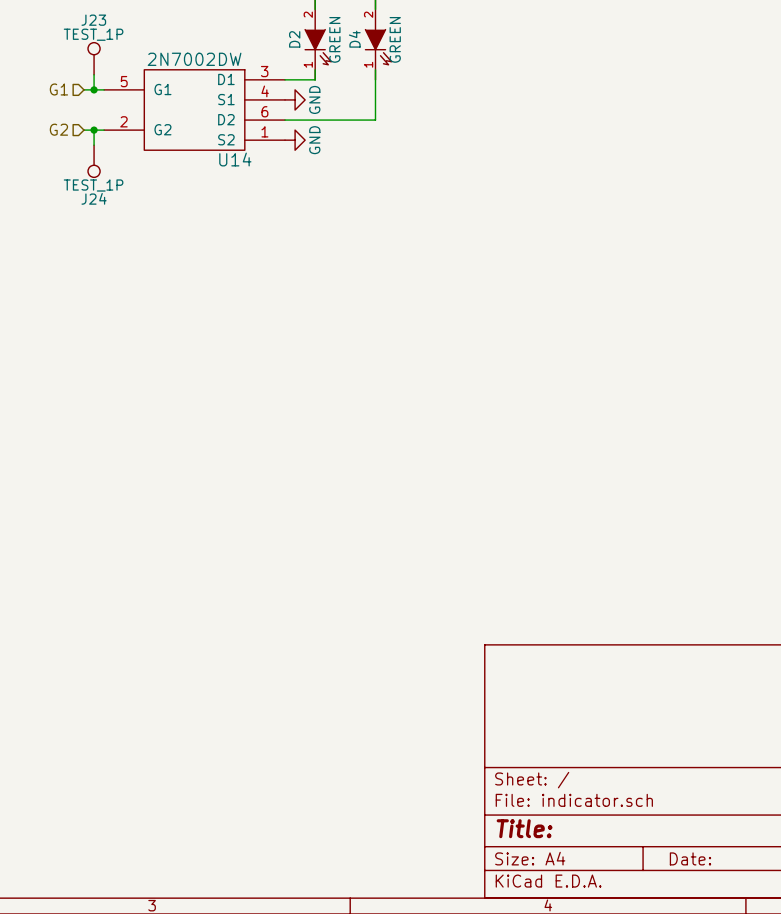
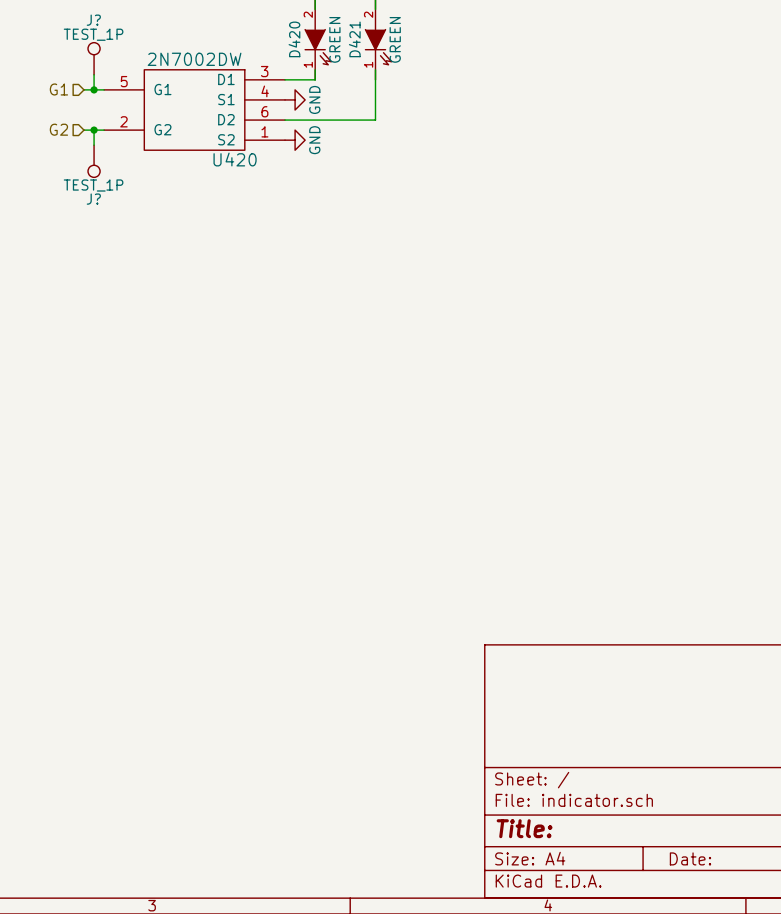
J23 name: J23 (93, 20) -> J? (93, 20)
D2 name: D2 (294, 39) -> D420 (294, 39)
D4 name: D4 (354, 39) -> D421 (354, 39)
U14 name: U14 (235, 159) -> U420 (235, 159)
J24 name: J24 (94, 198) -> J? (93, 199)

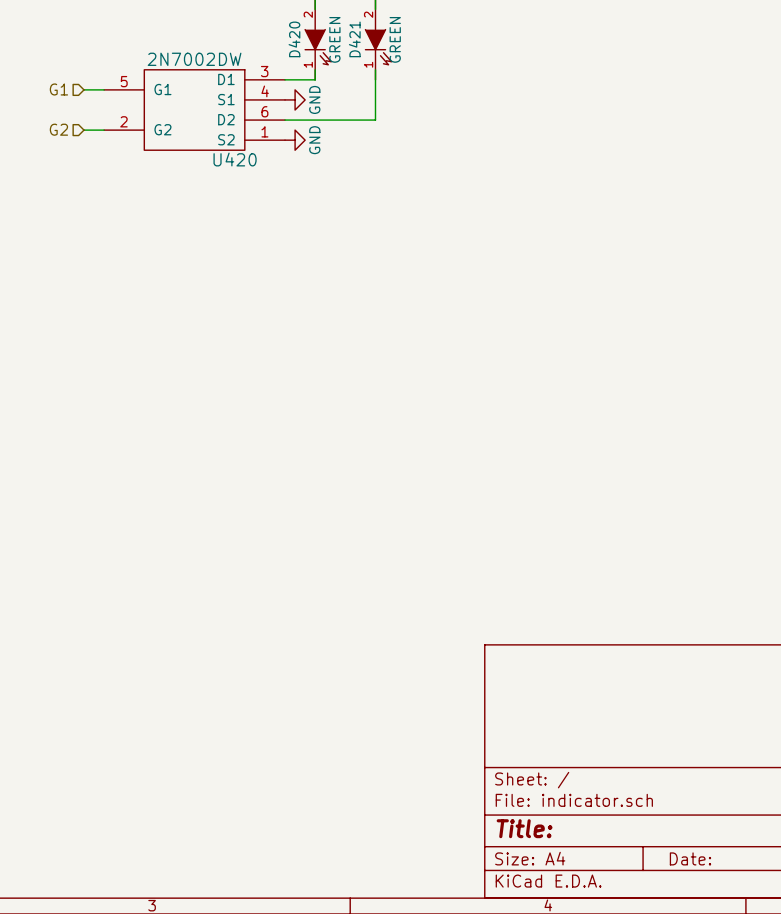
J?: TEST_1P (94, 58) -> none
wire: (94, 74) (94, 89) -> none
junction: (94, 89) -> none
wire: (94, 130) (94, 145) -> none
junction: (94, 130) -> none
J?: TEST_1P (94, 161) -> none

